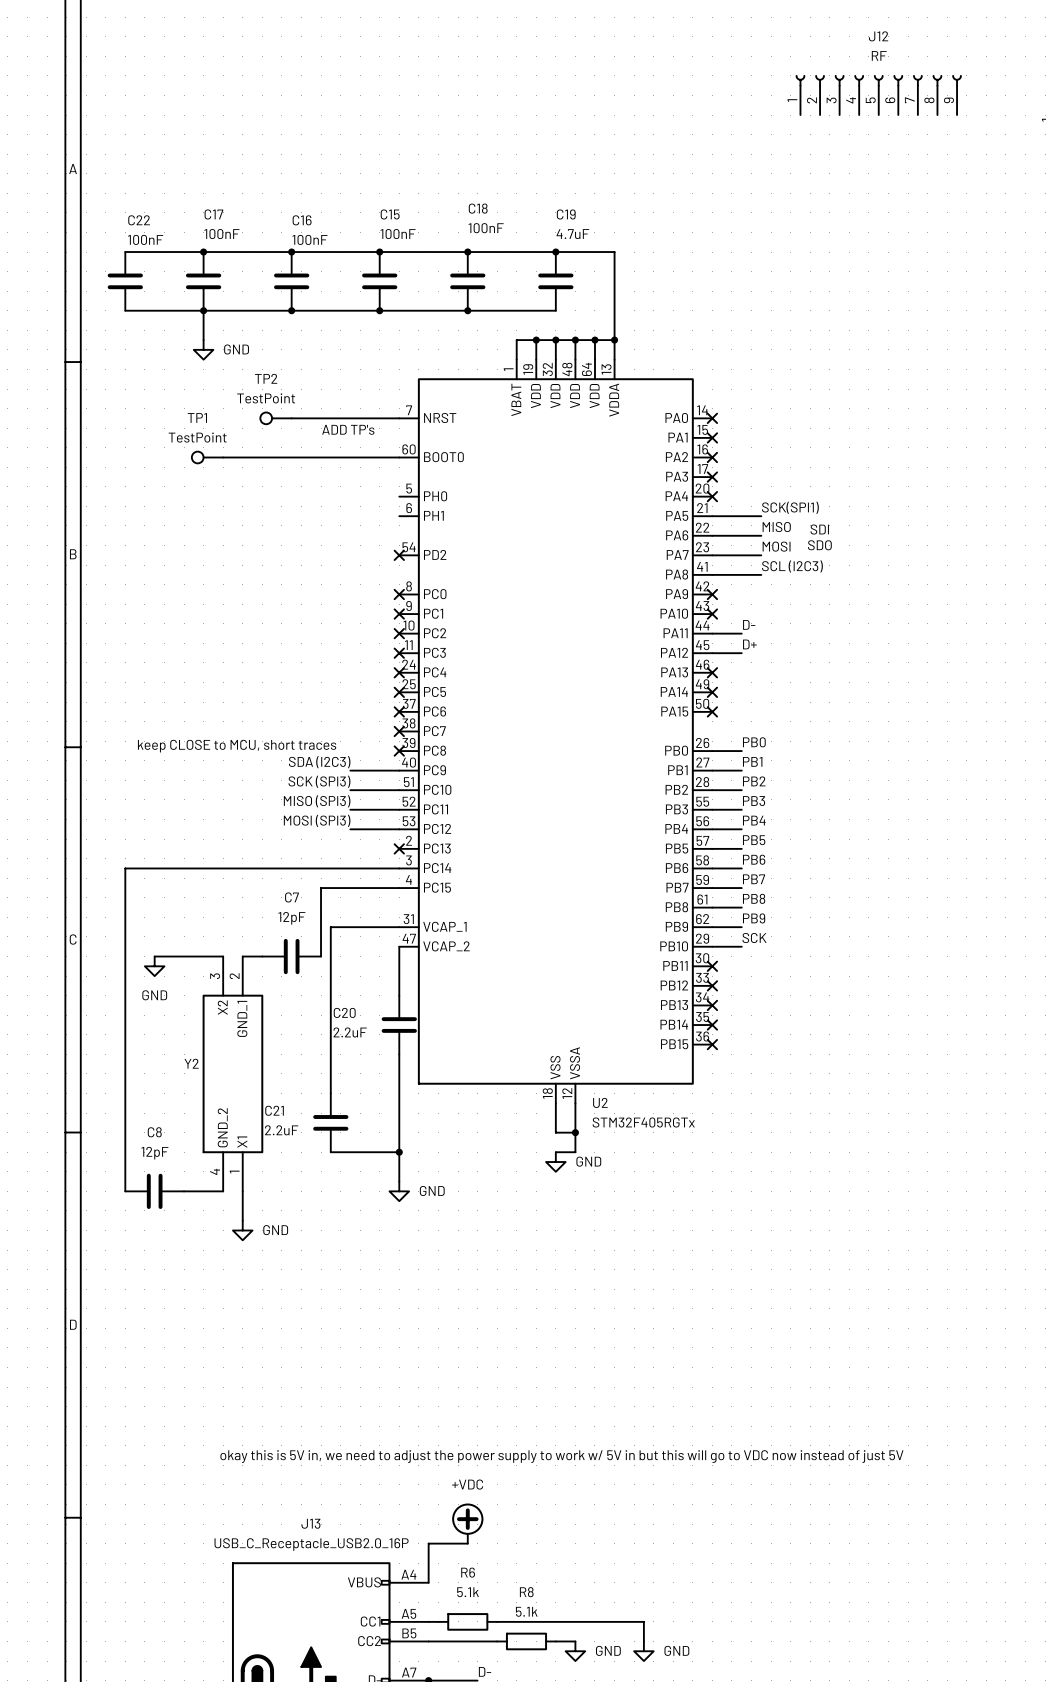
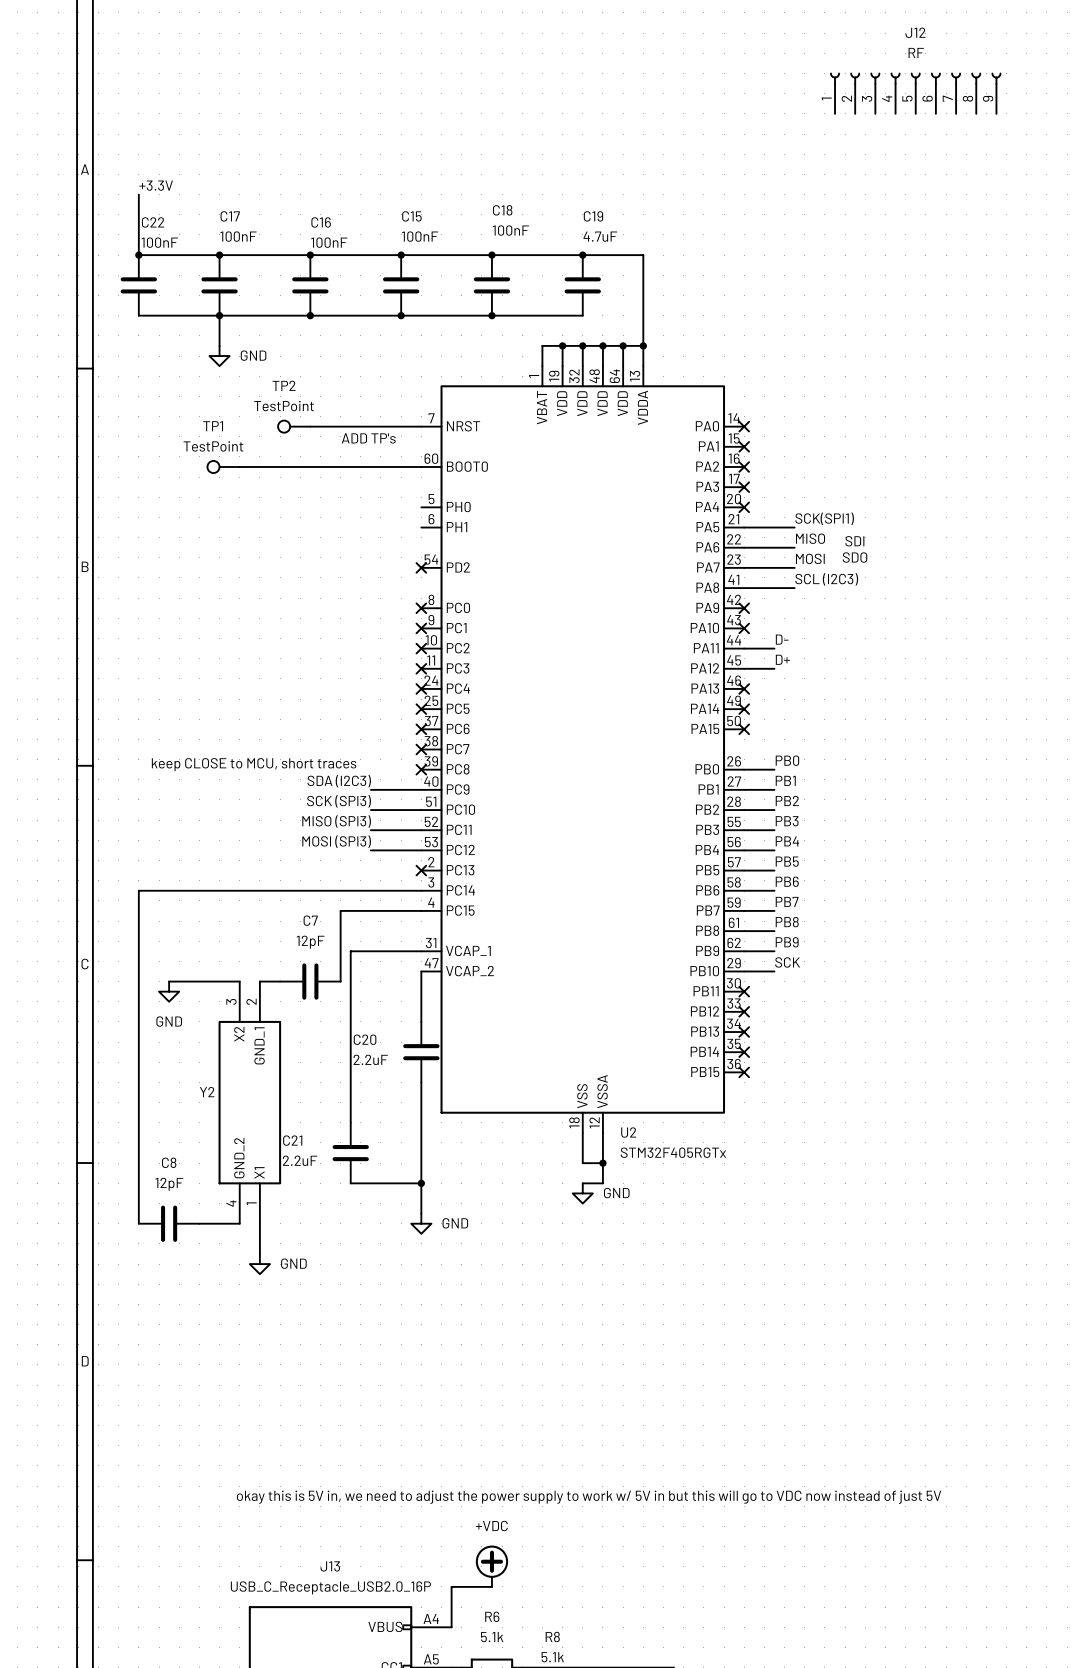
label: none -> +3.3V (156, 185)
wire: none -> (138, 194) (138, 255)
junction: none -> (138, 255)

